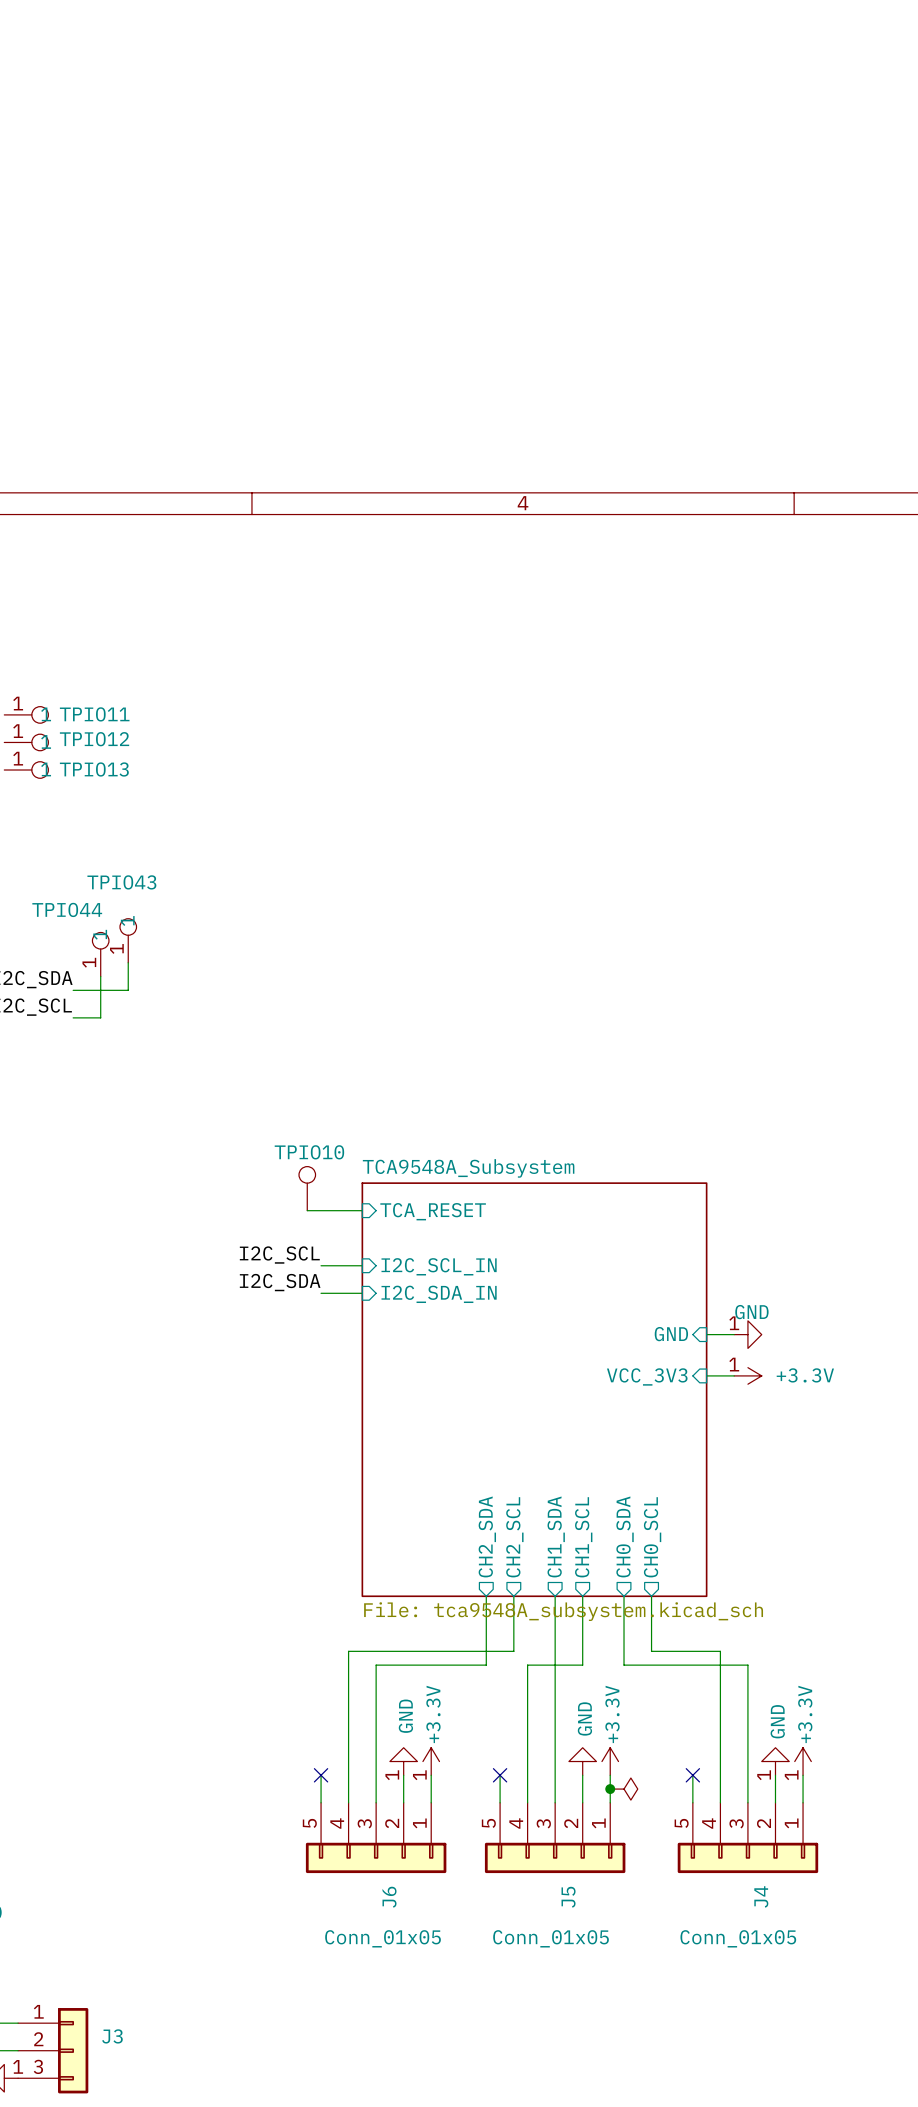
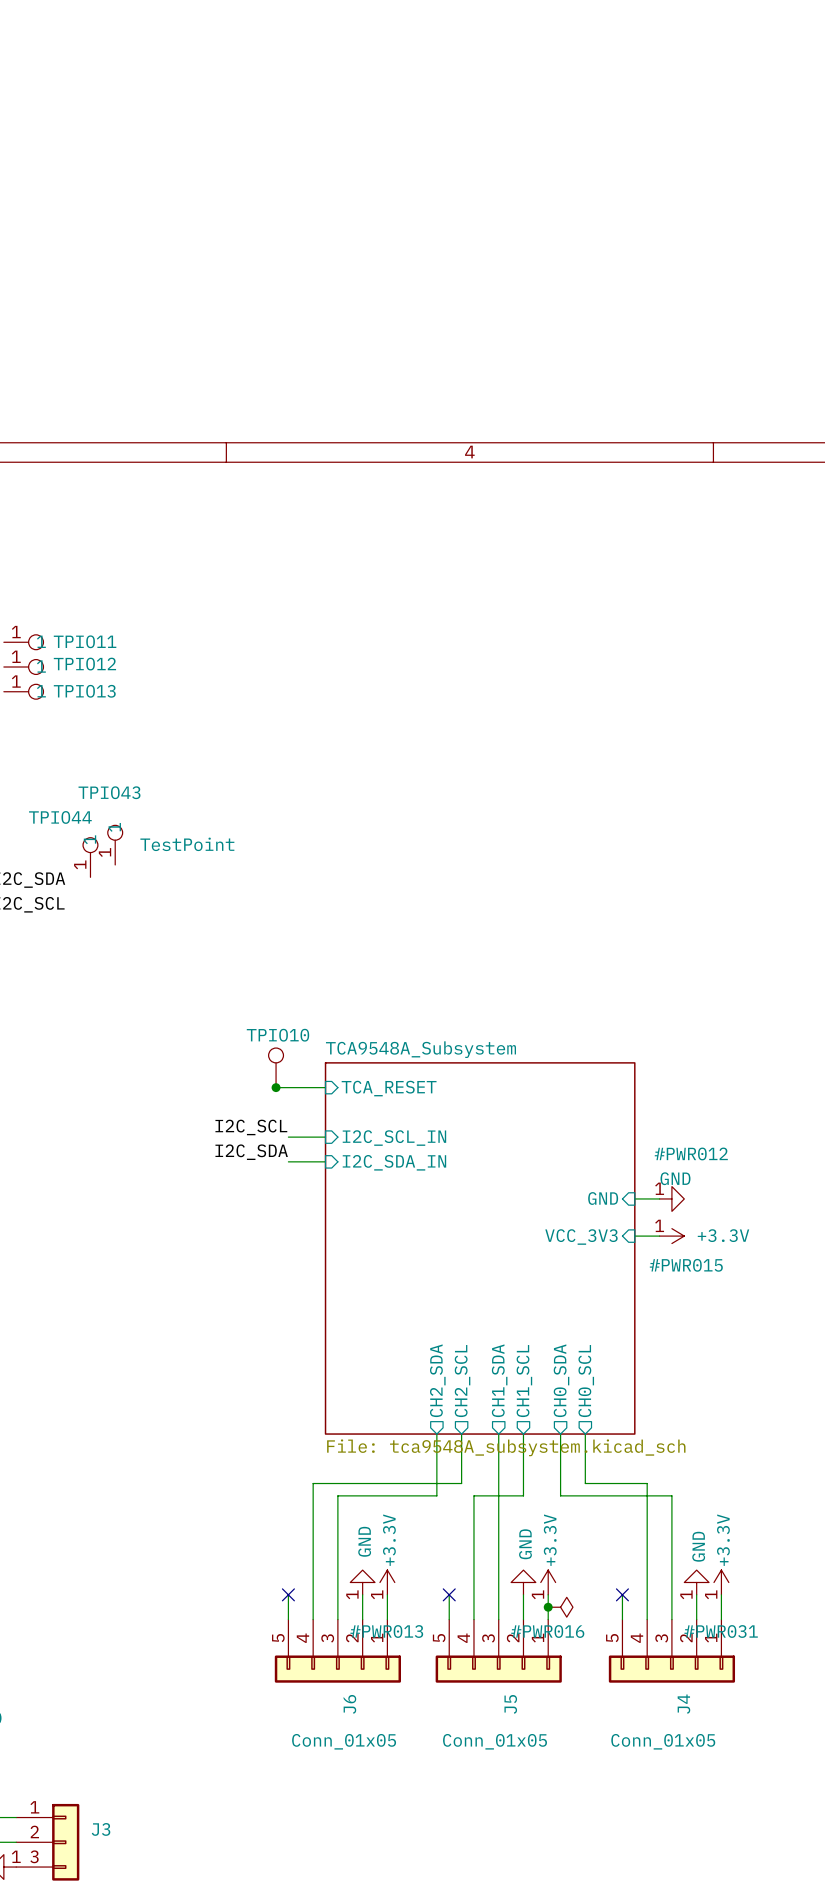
TPIO43 value: none -> TestPoint (187, 844)
wire: (128, 962) (128, 990) (73, 990) -> none
wire: (100, 976) (100, 1017) (73, 1017) -> none
junction: none -> (276, 1087)
#PWR012 name: none -> #PWR012 (691, 1153)
#PWR015 name: none -> #PWR015 (686, 1265)
#PWR016 pin number: none -> 1 (538, 1594)
#PWR013 name: none -> #PWR013 (386, 1631)
#PWR016 name: none -> #PWR016 (547, 1631)
#PWR031 name: none -> #PWR031 (721, 1631)

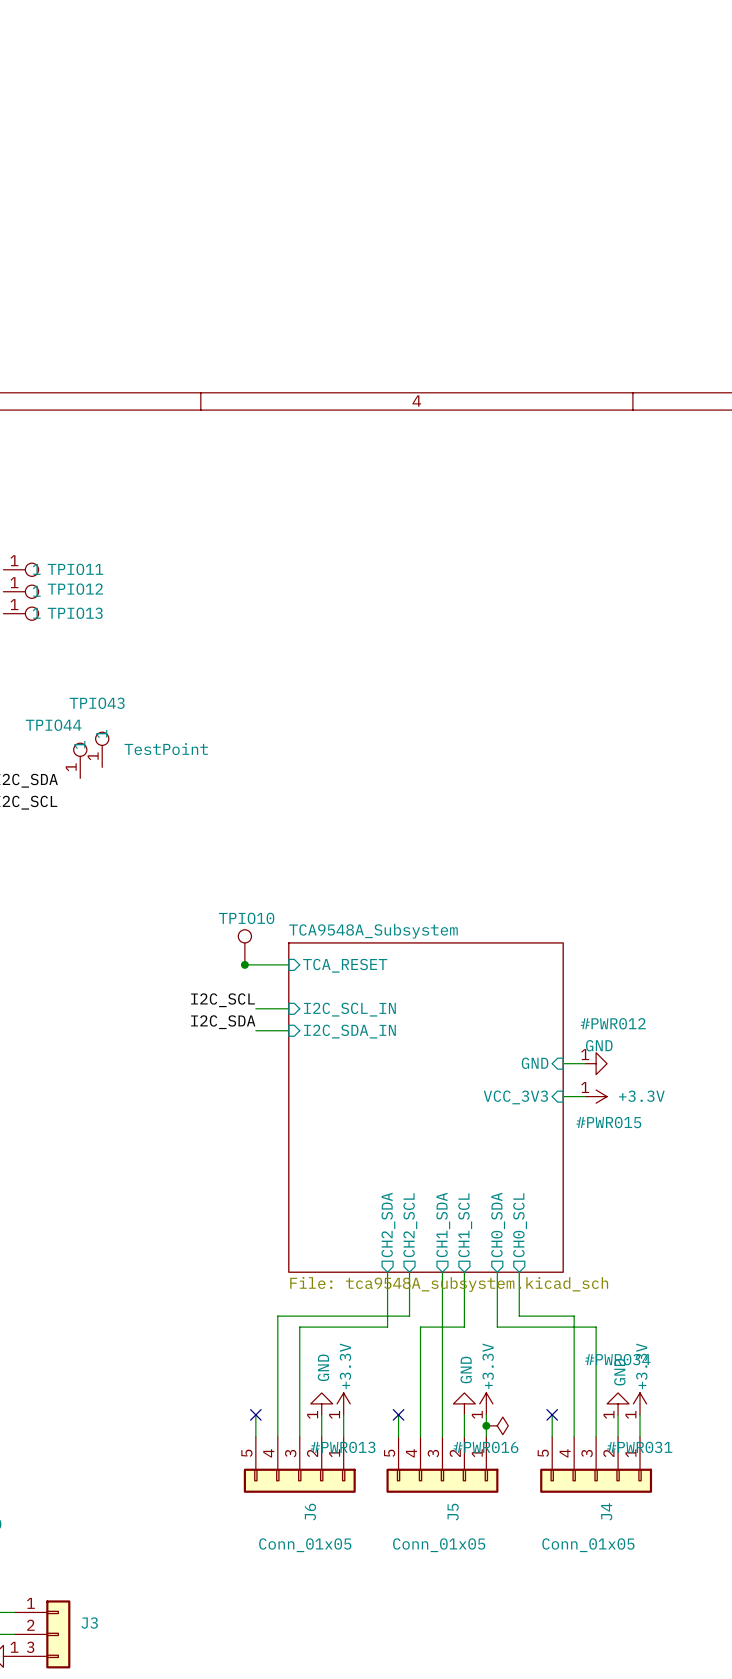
#PWR034 name: none -> #PWR034 (617, 1359)

